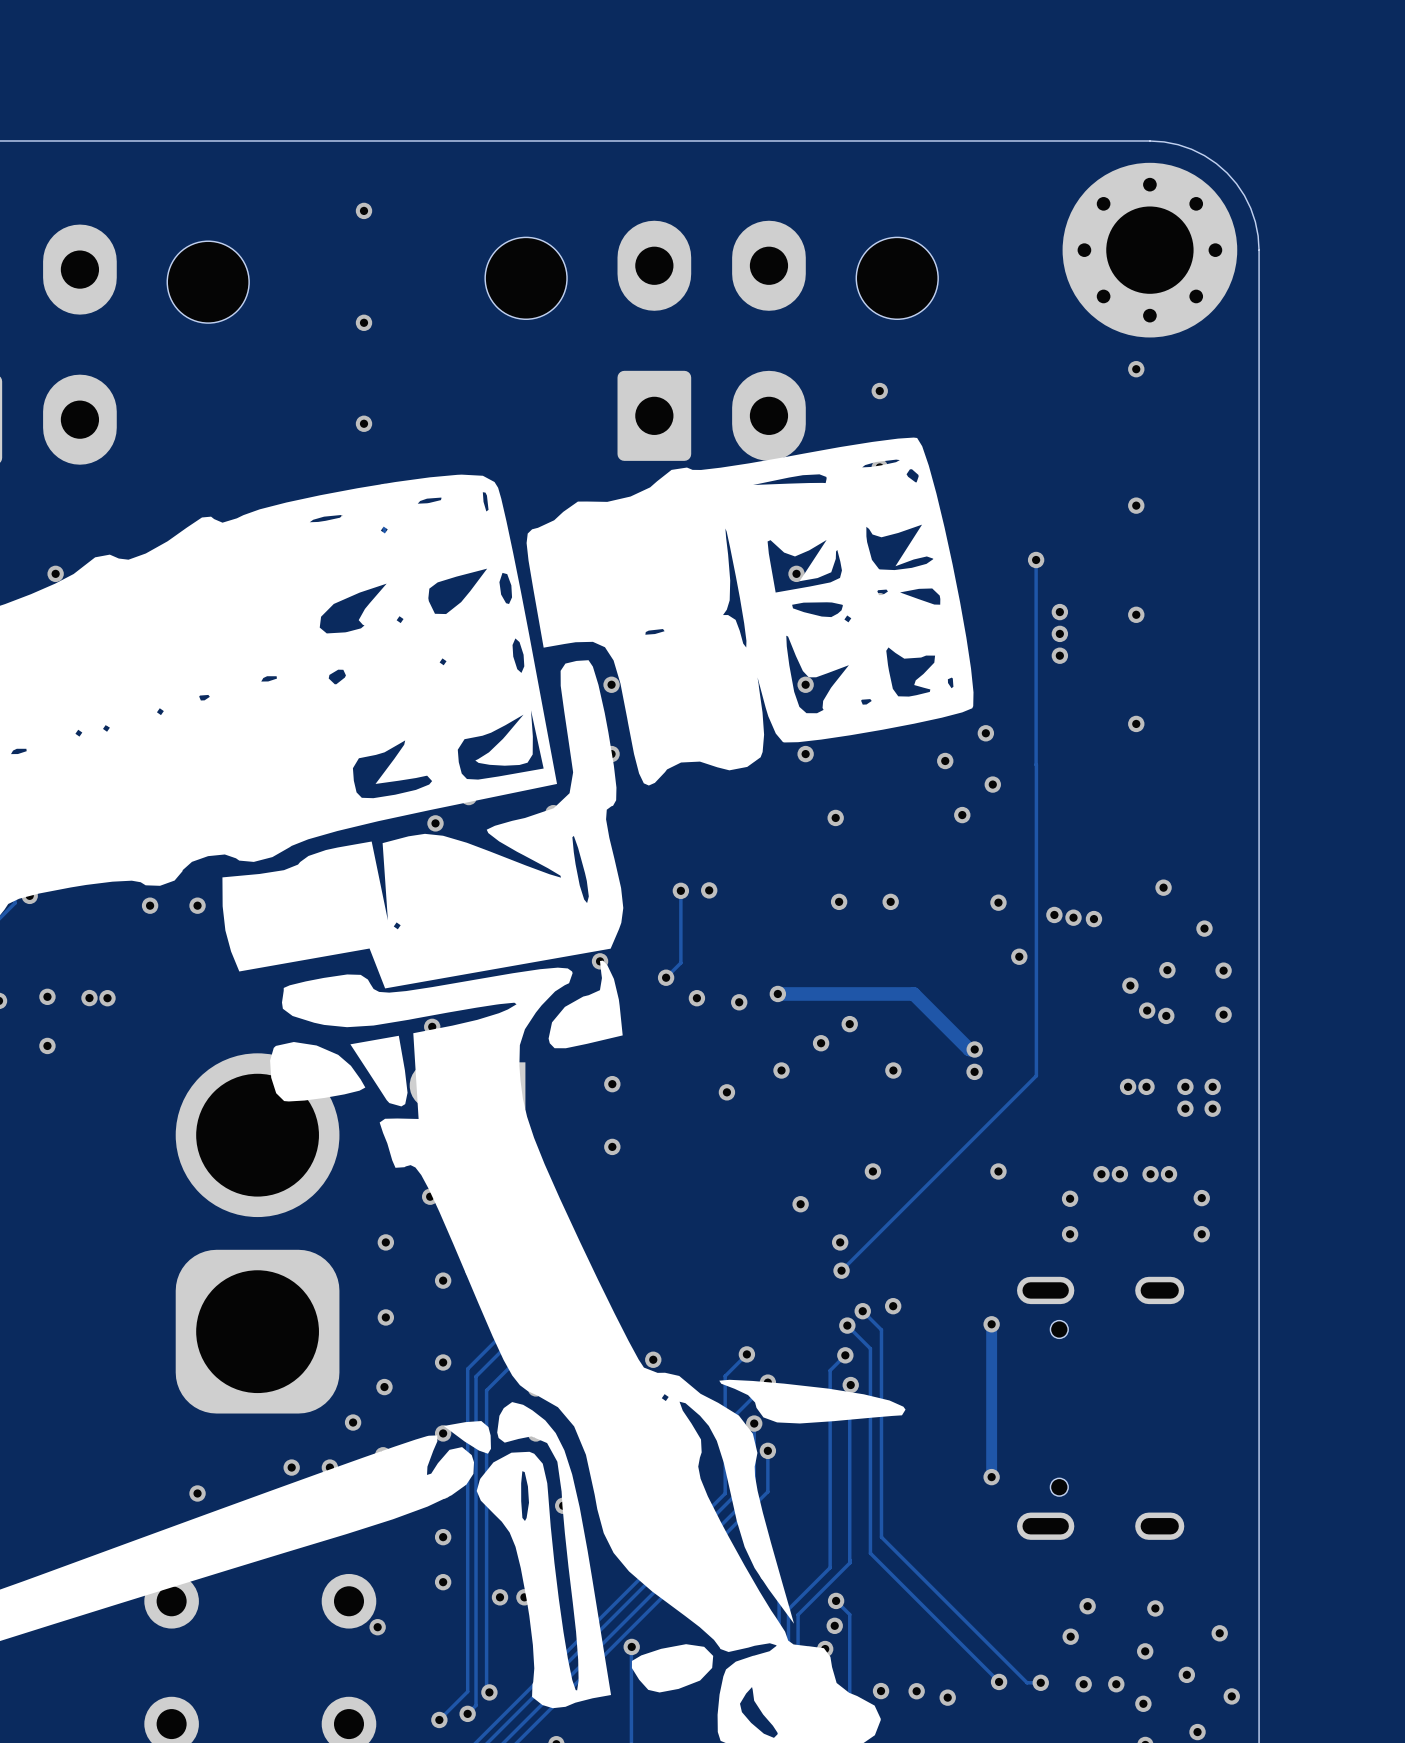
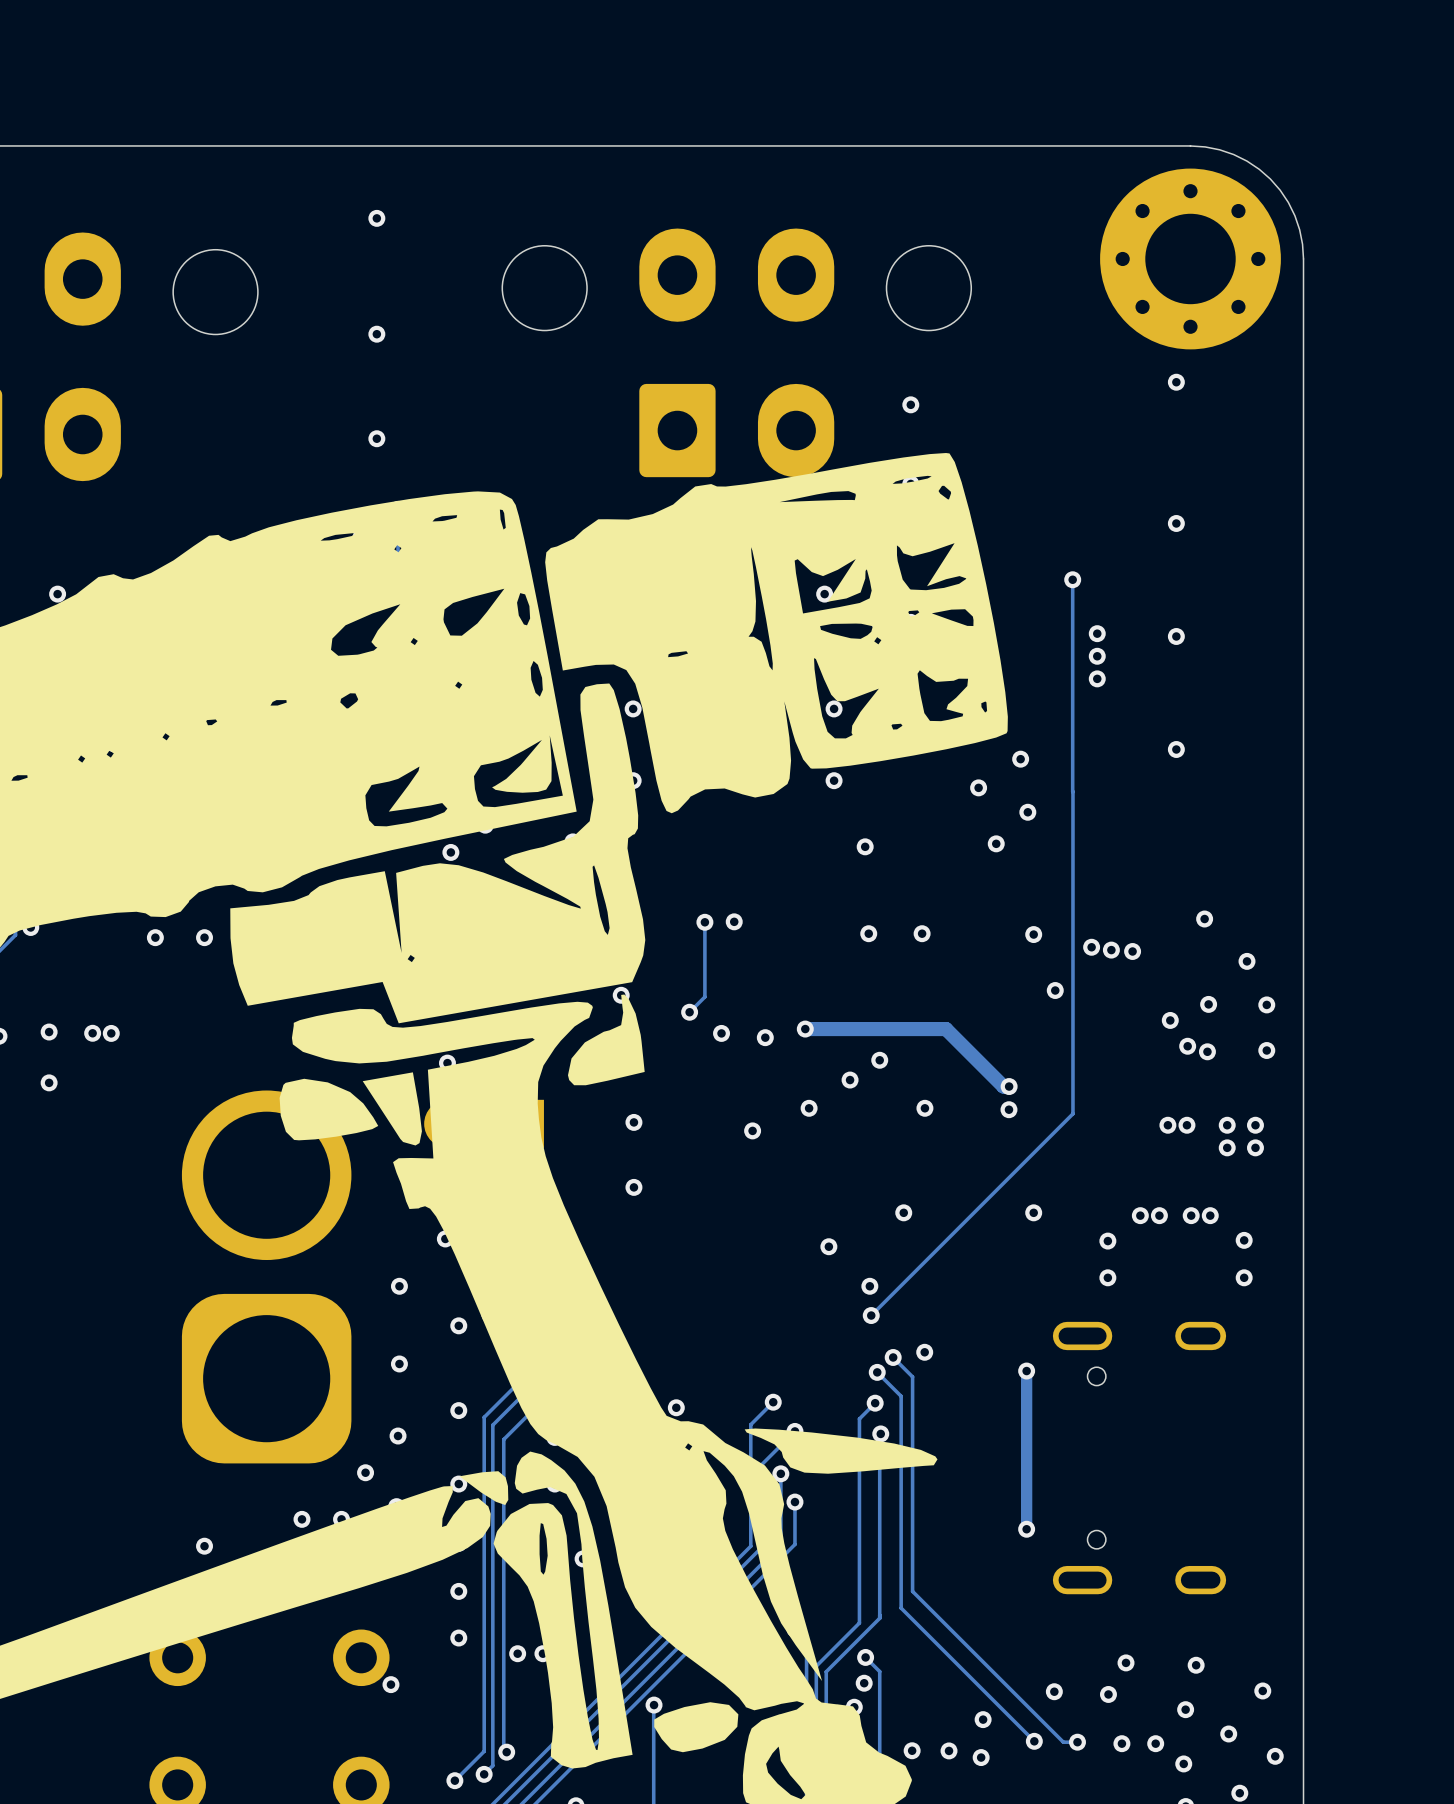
via: none -> (1054, 1691)
via: none -> (983, 1719)

